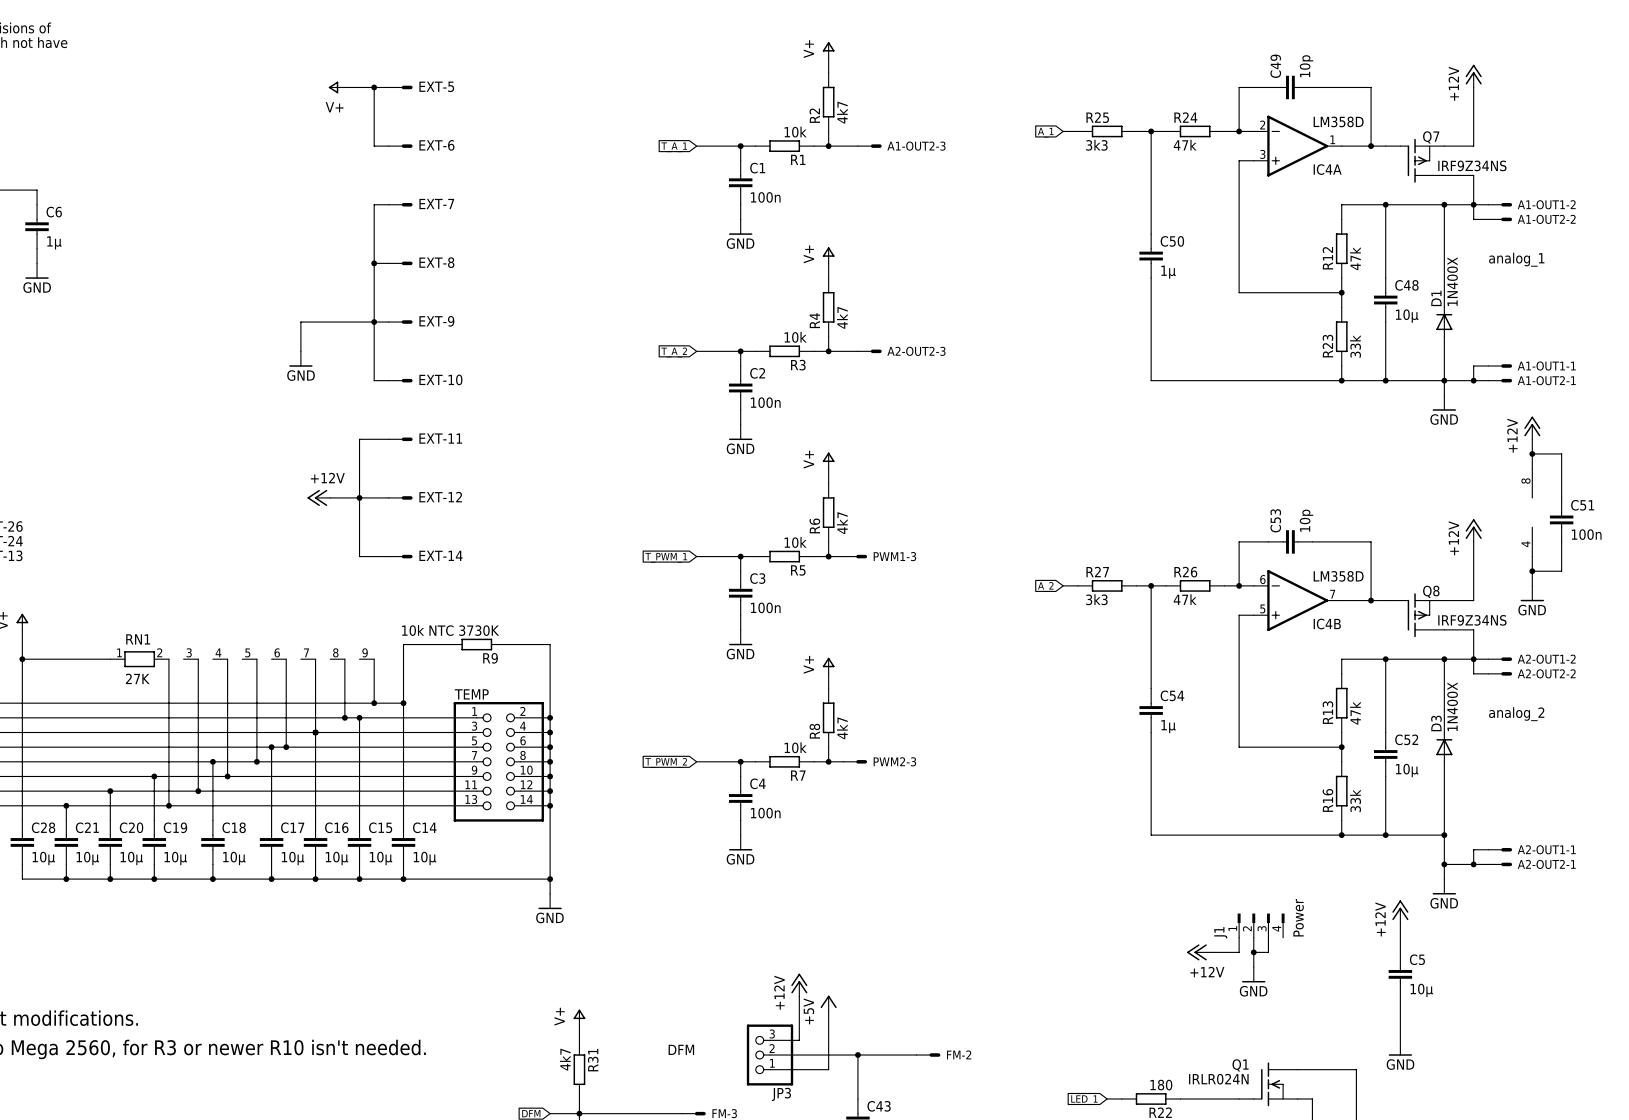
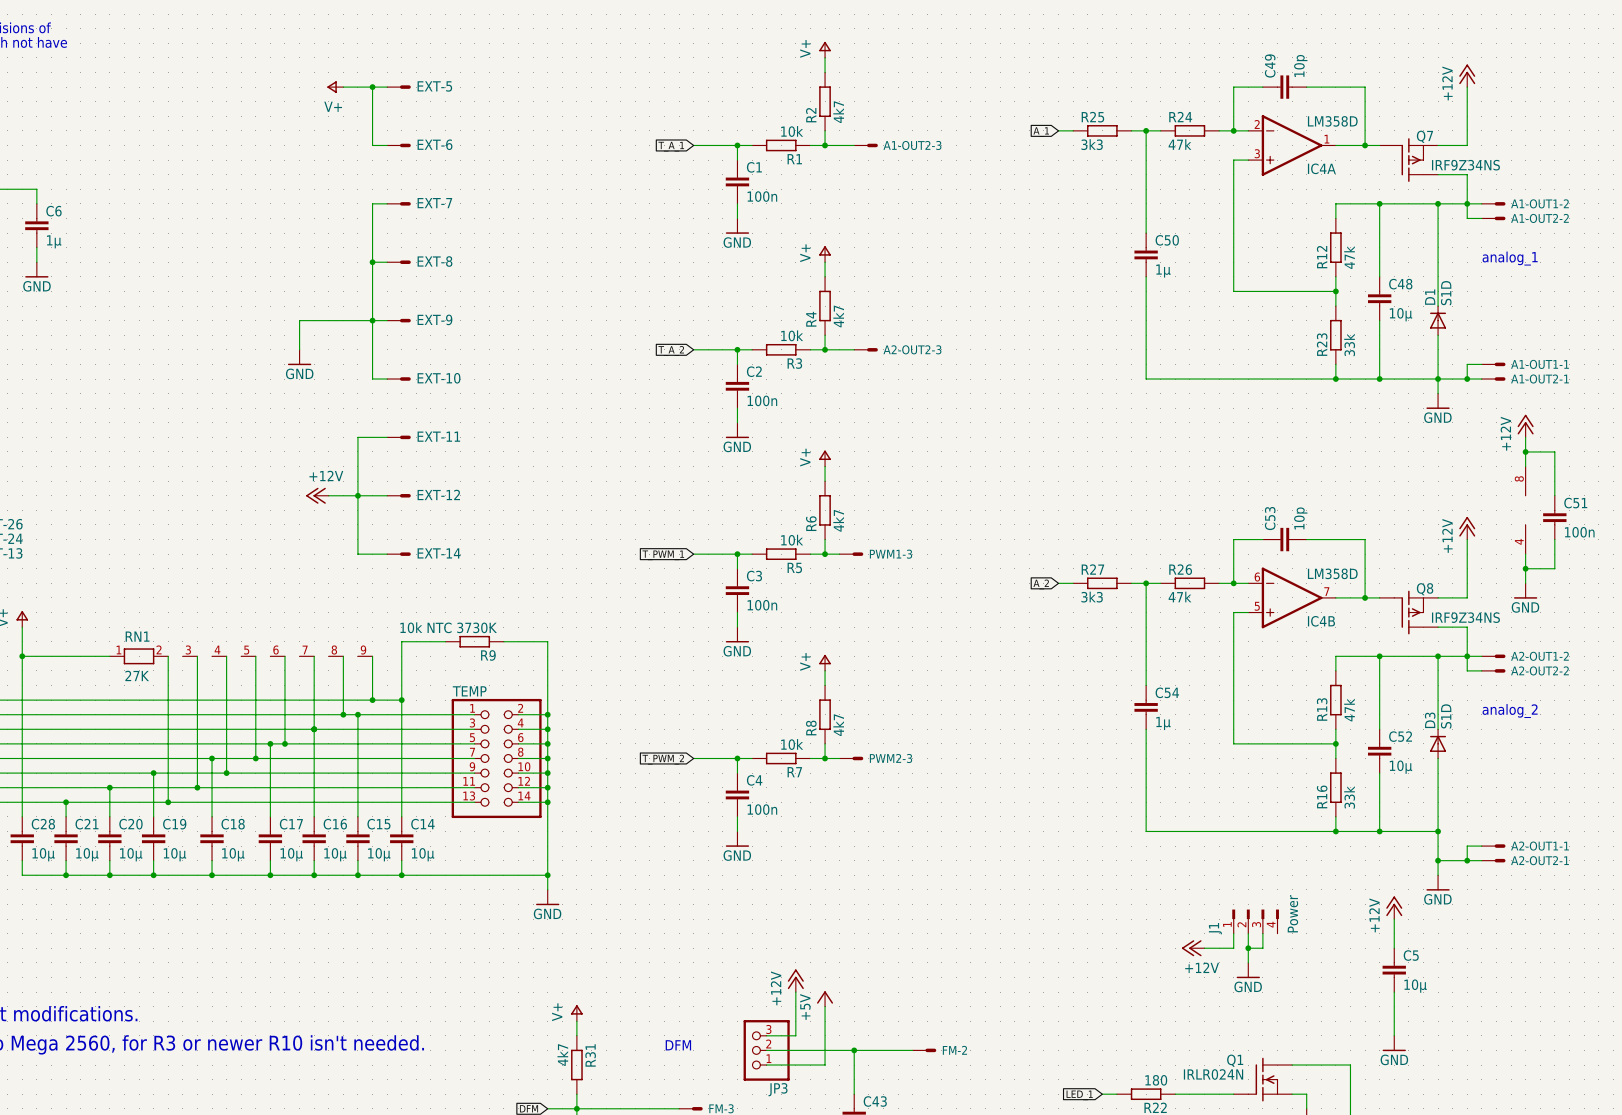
D1 value: 1N400X (1452, 281) -> S1D (1446, 293)
D3 value: 1N400X (1452, 706) -> S1D (1446, 716)

